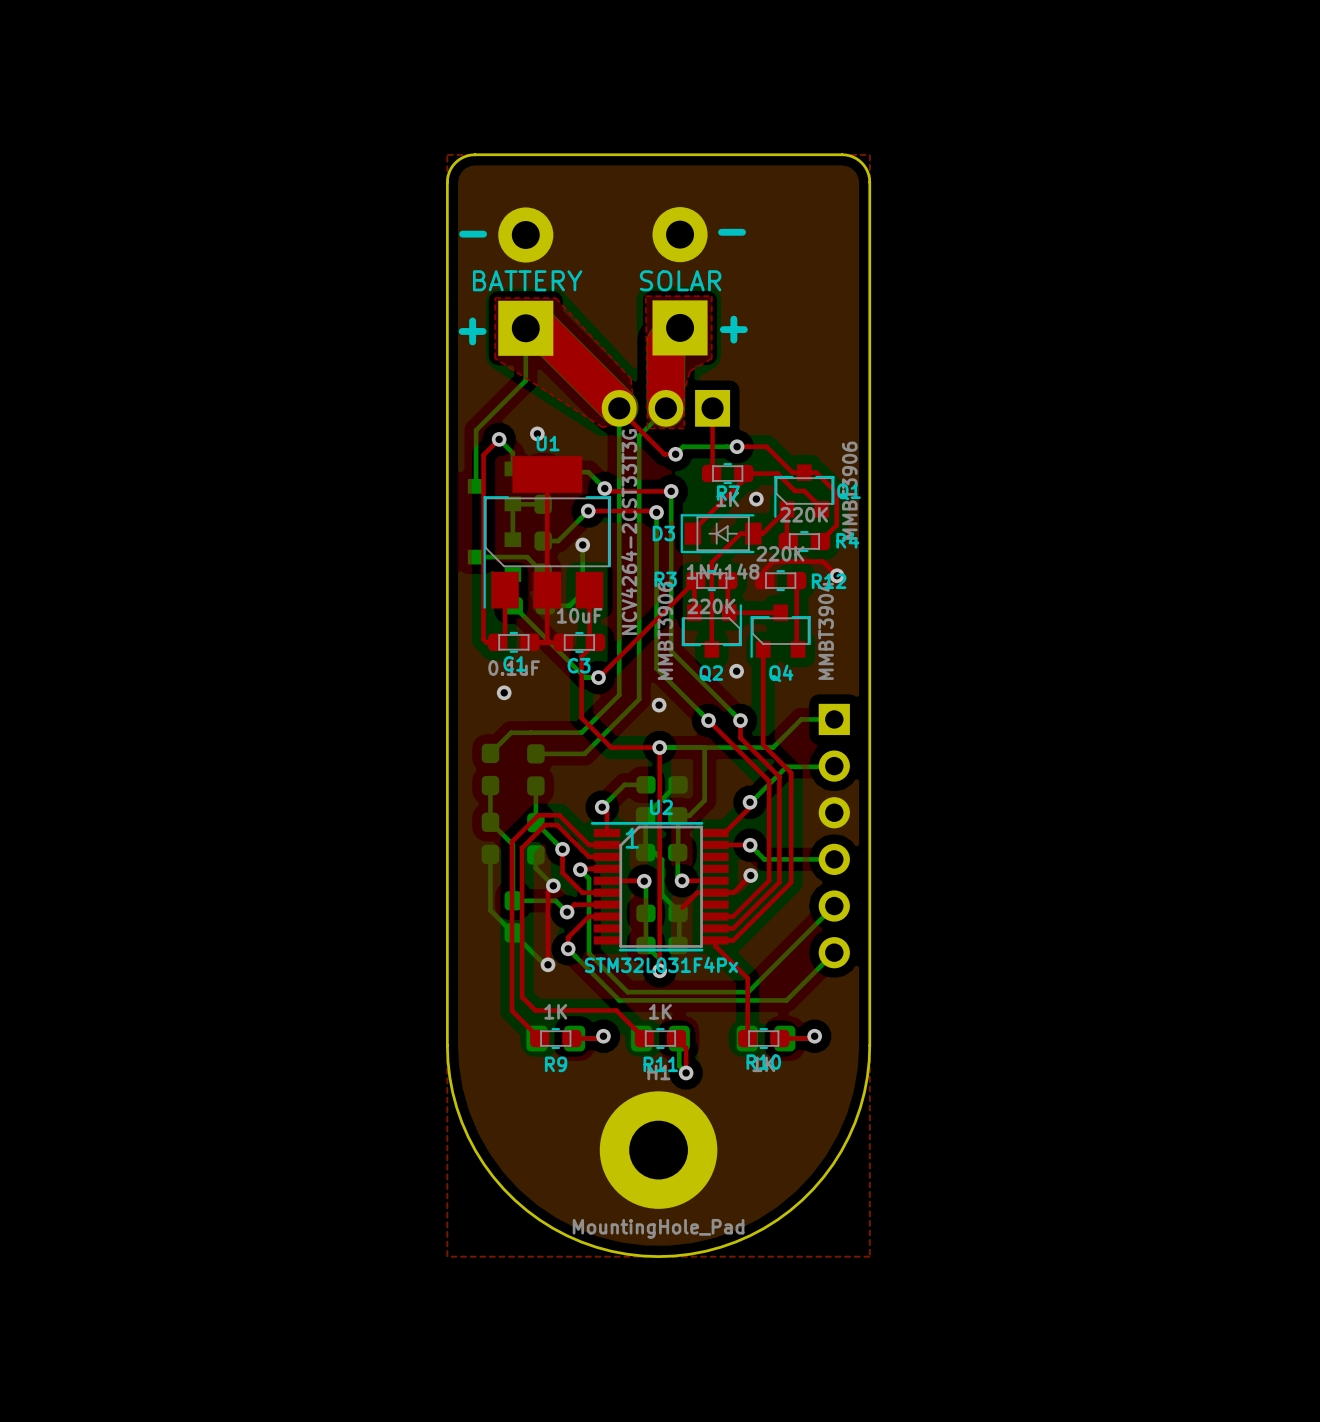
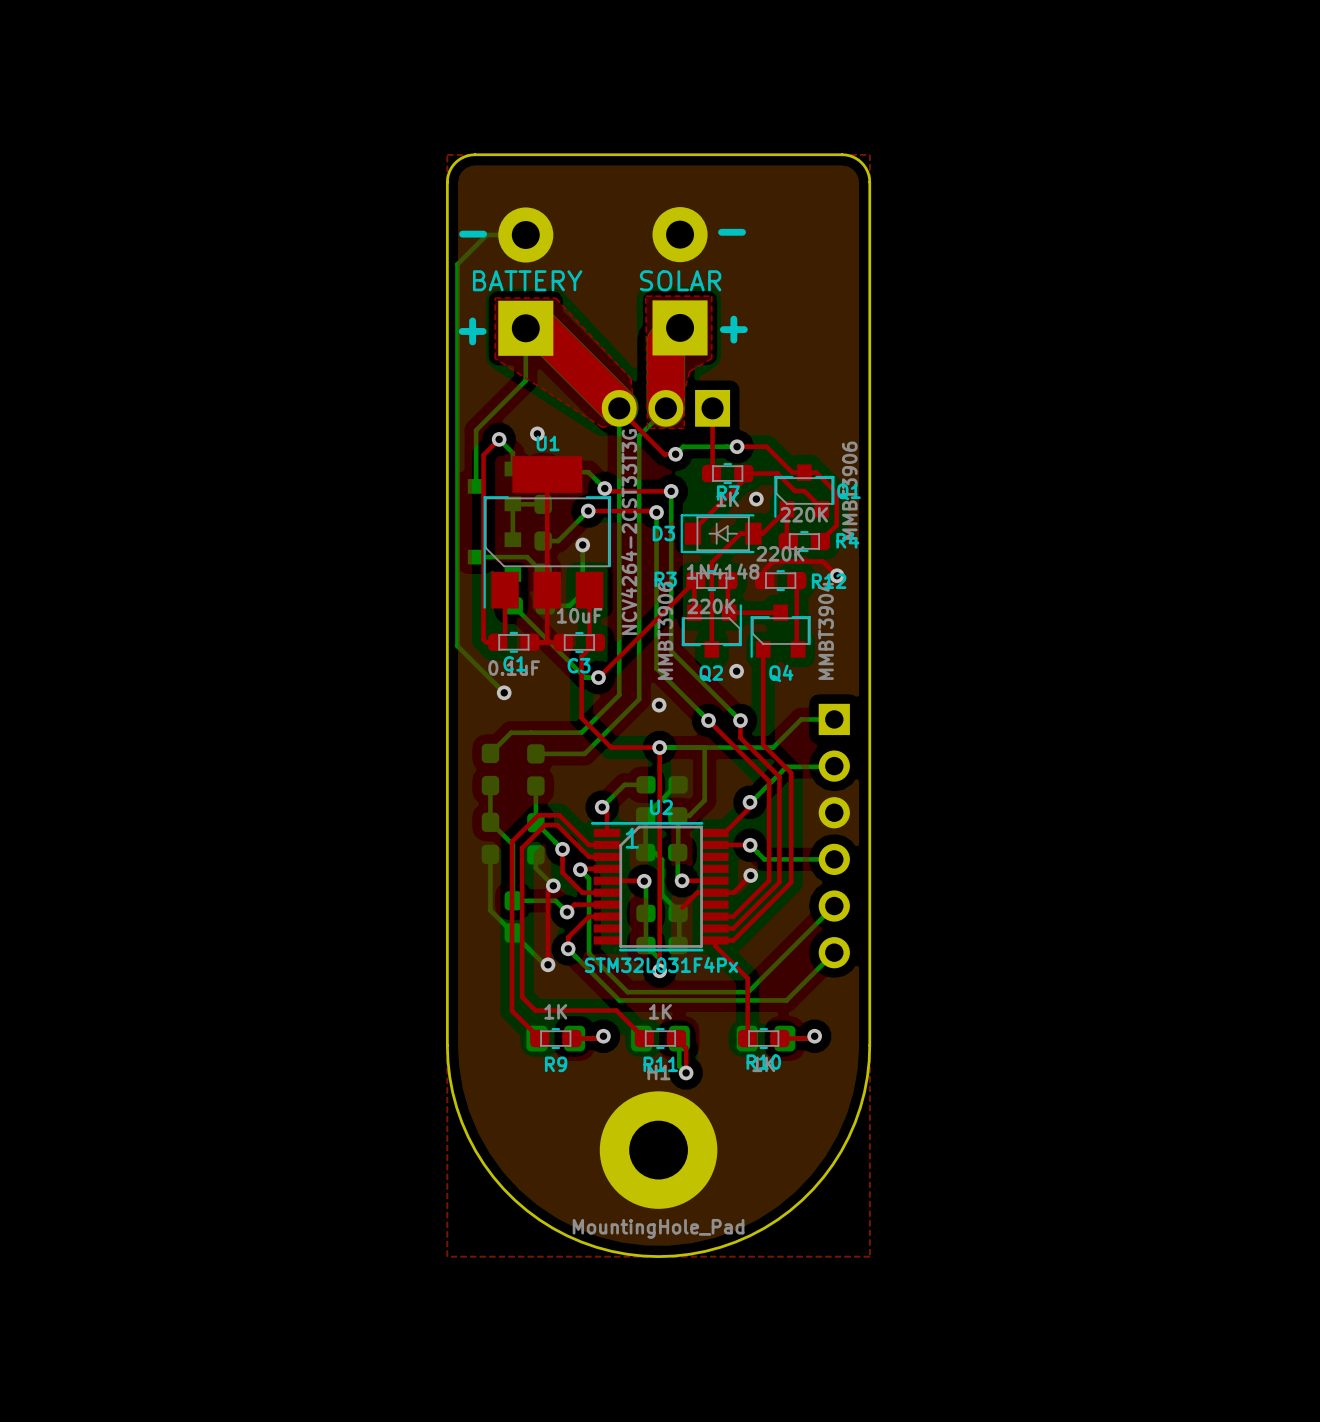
bottom track: none -> (525, 235) (486, 235) (457, 264) (457, 646) (504, 692)

